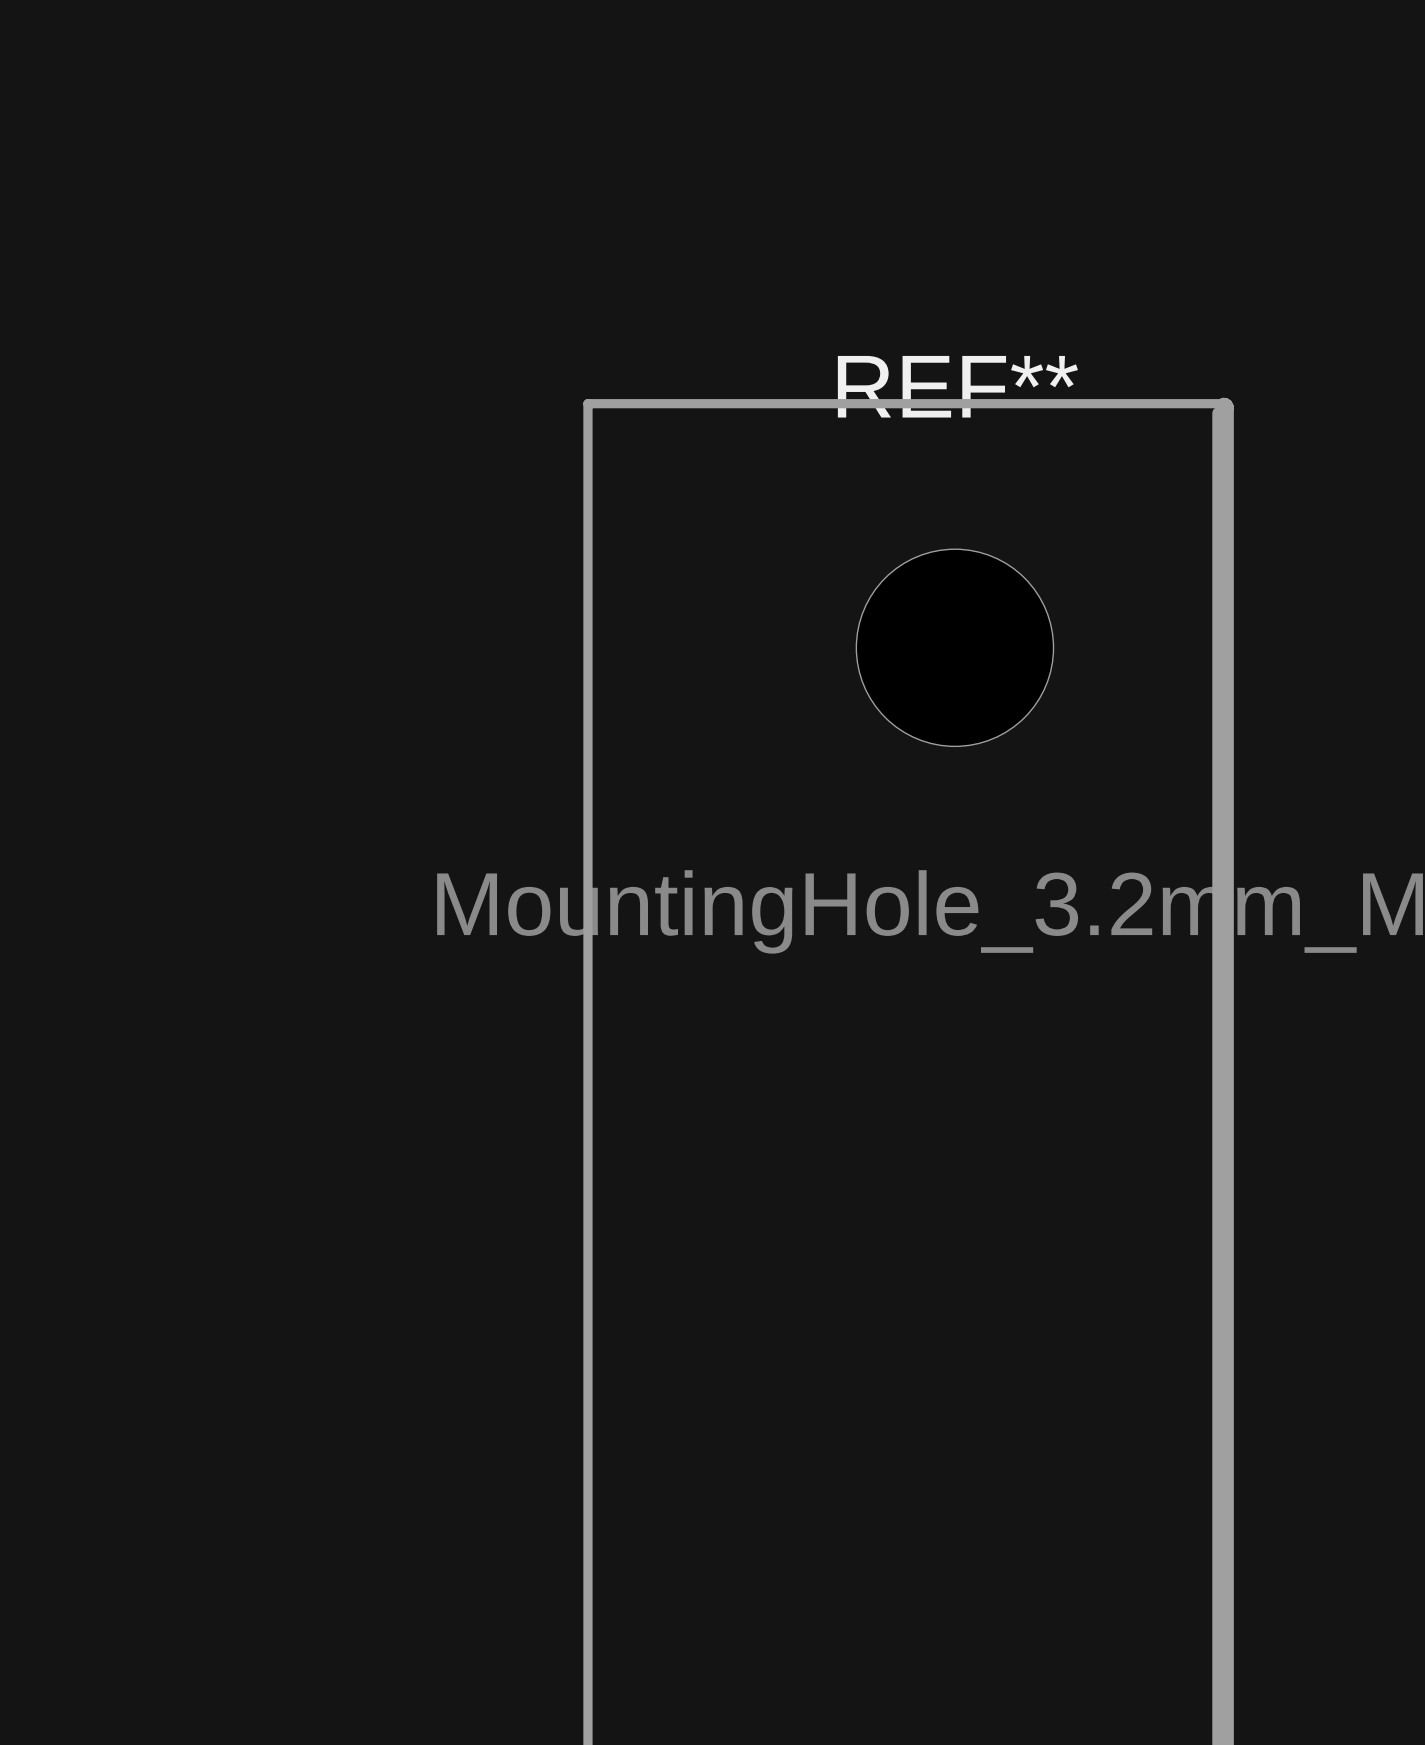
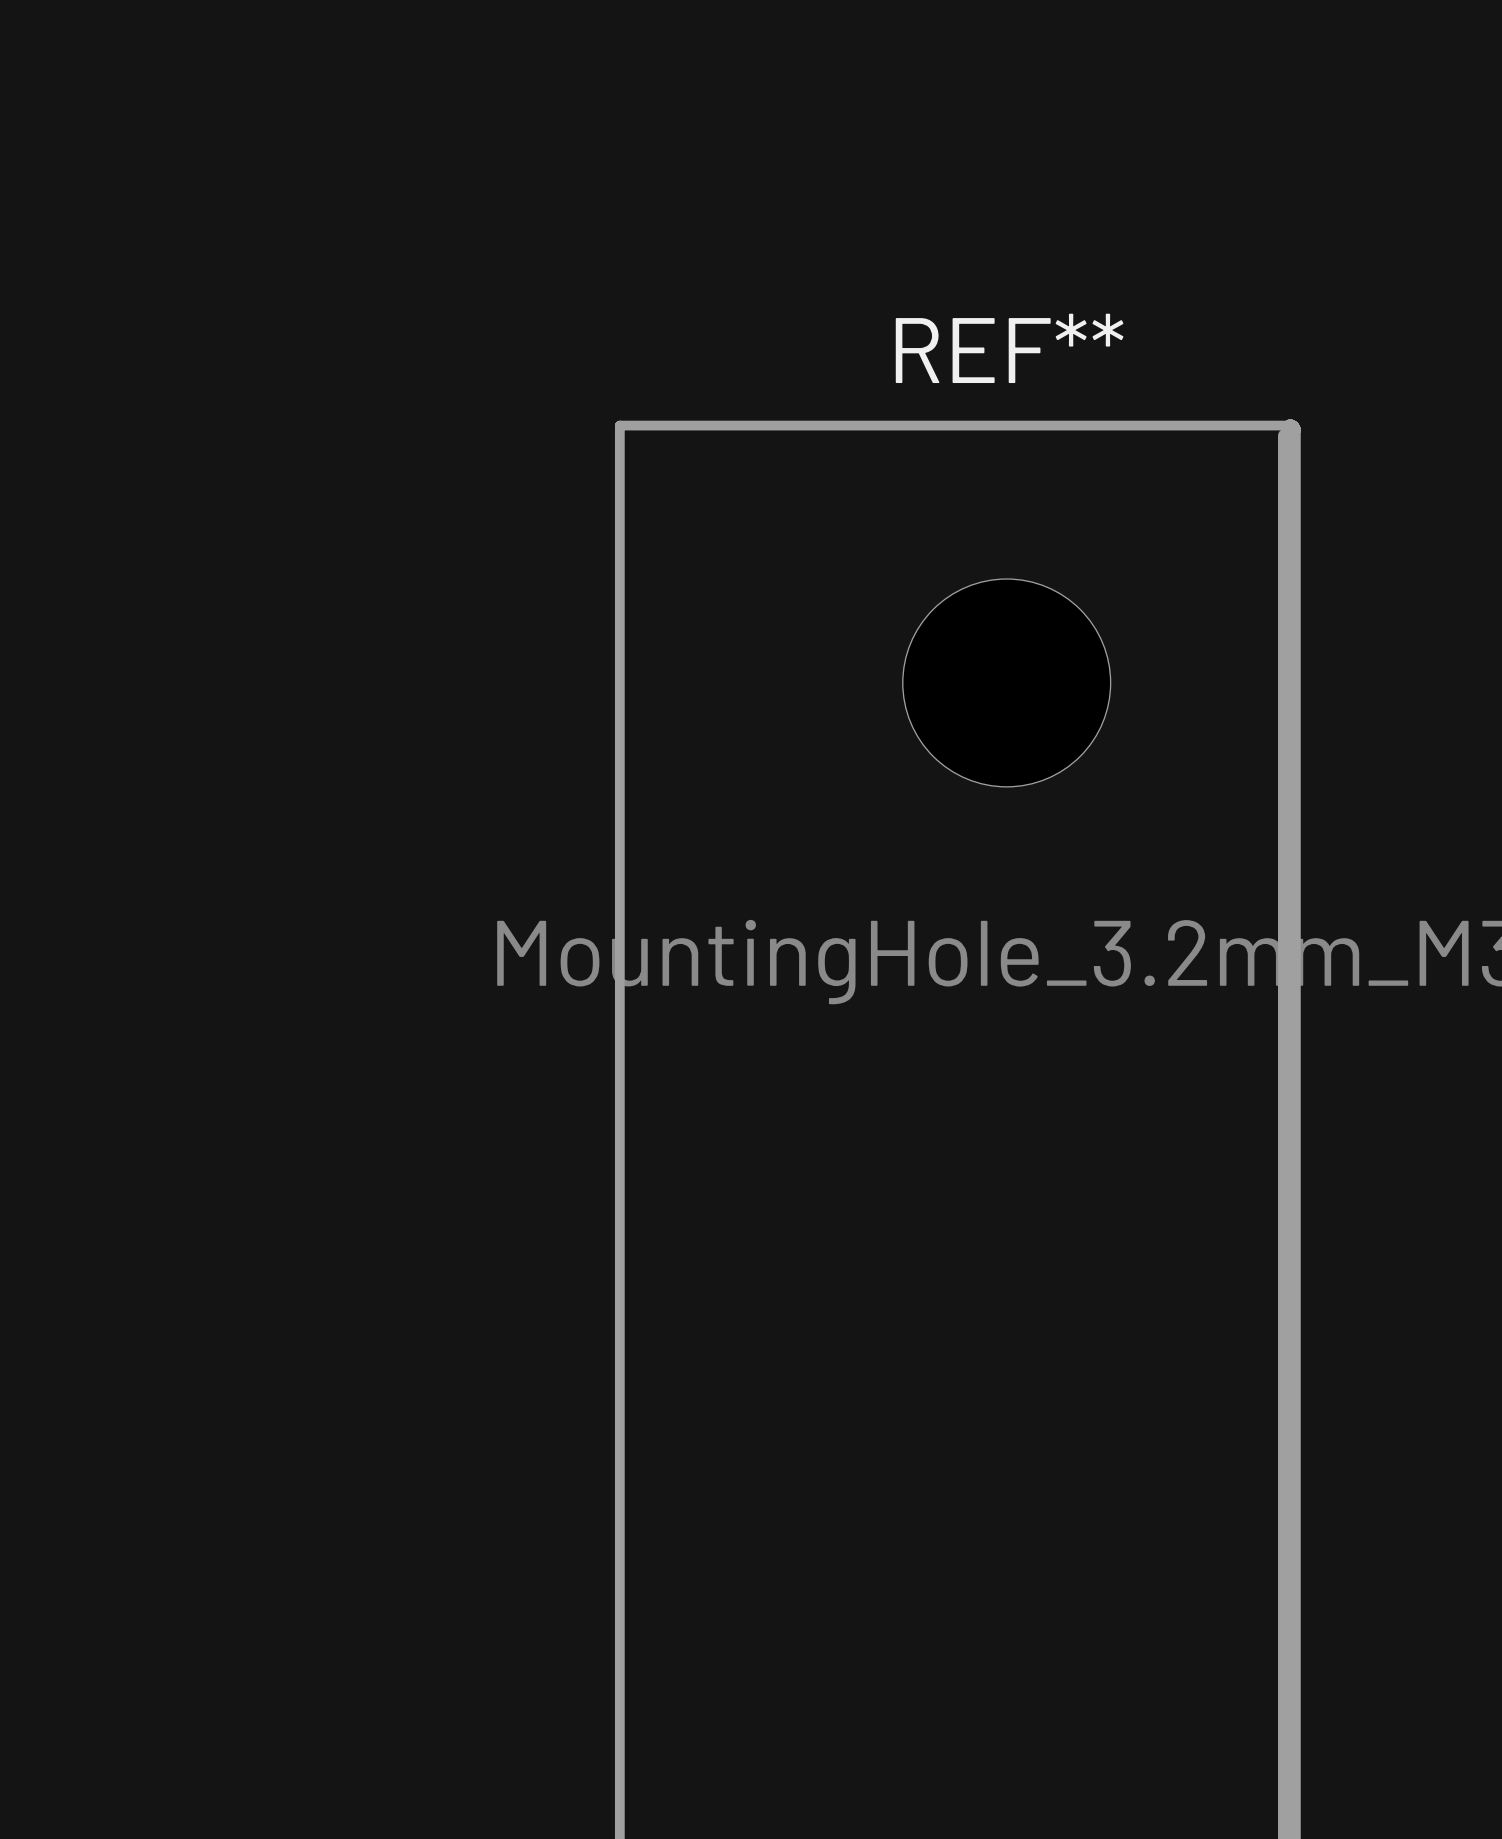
REF** name position: REF** (957, 386) -> REF** (1009, 348)

